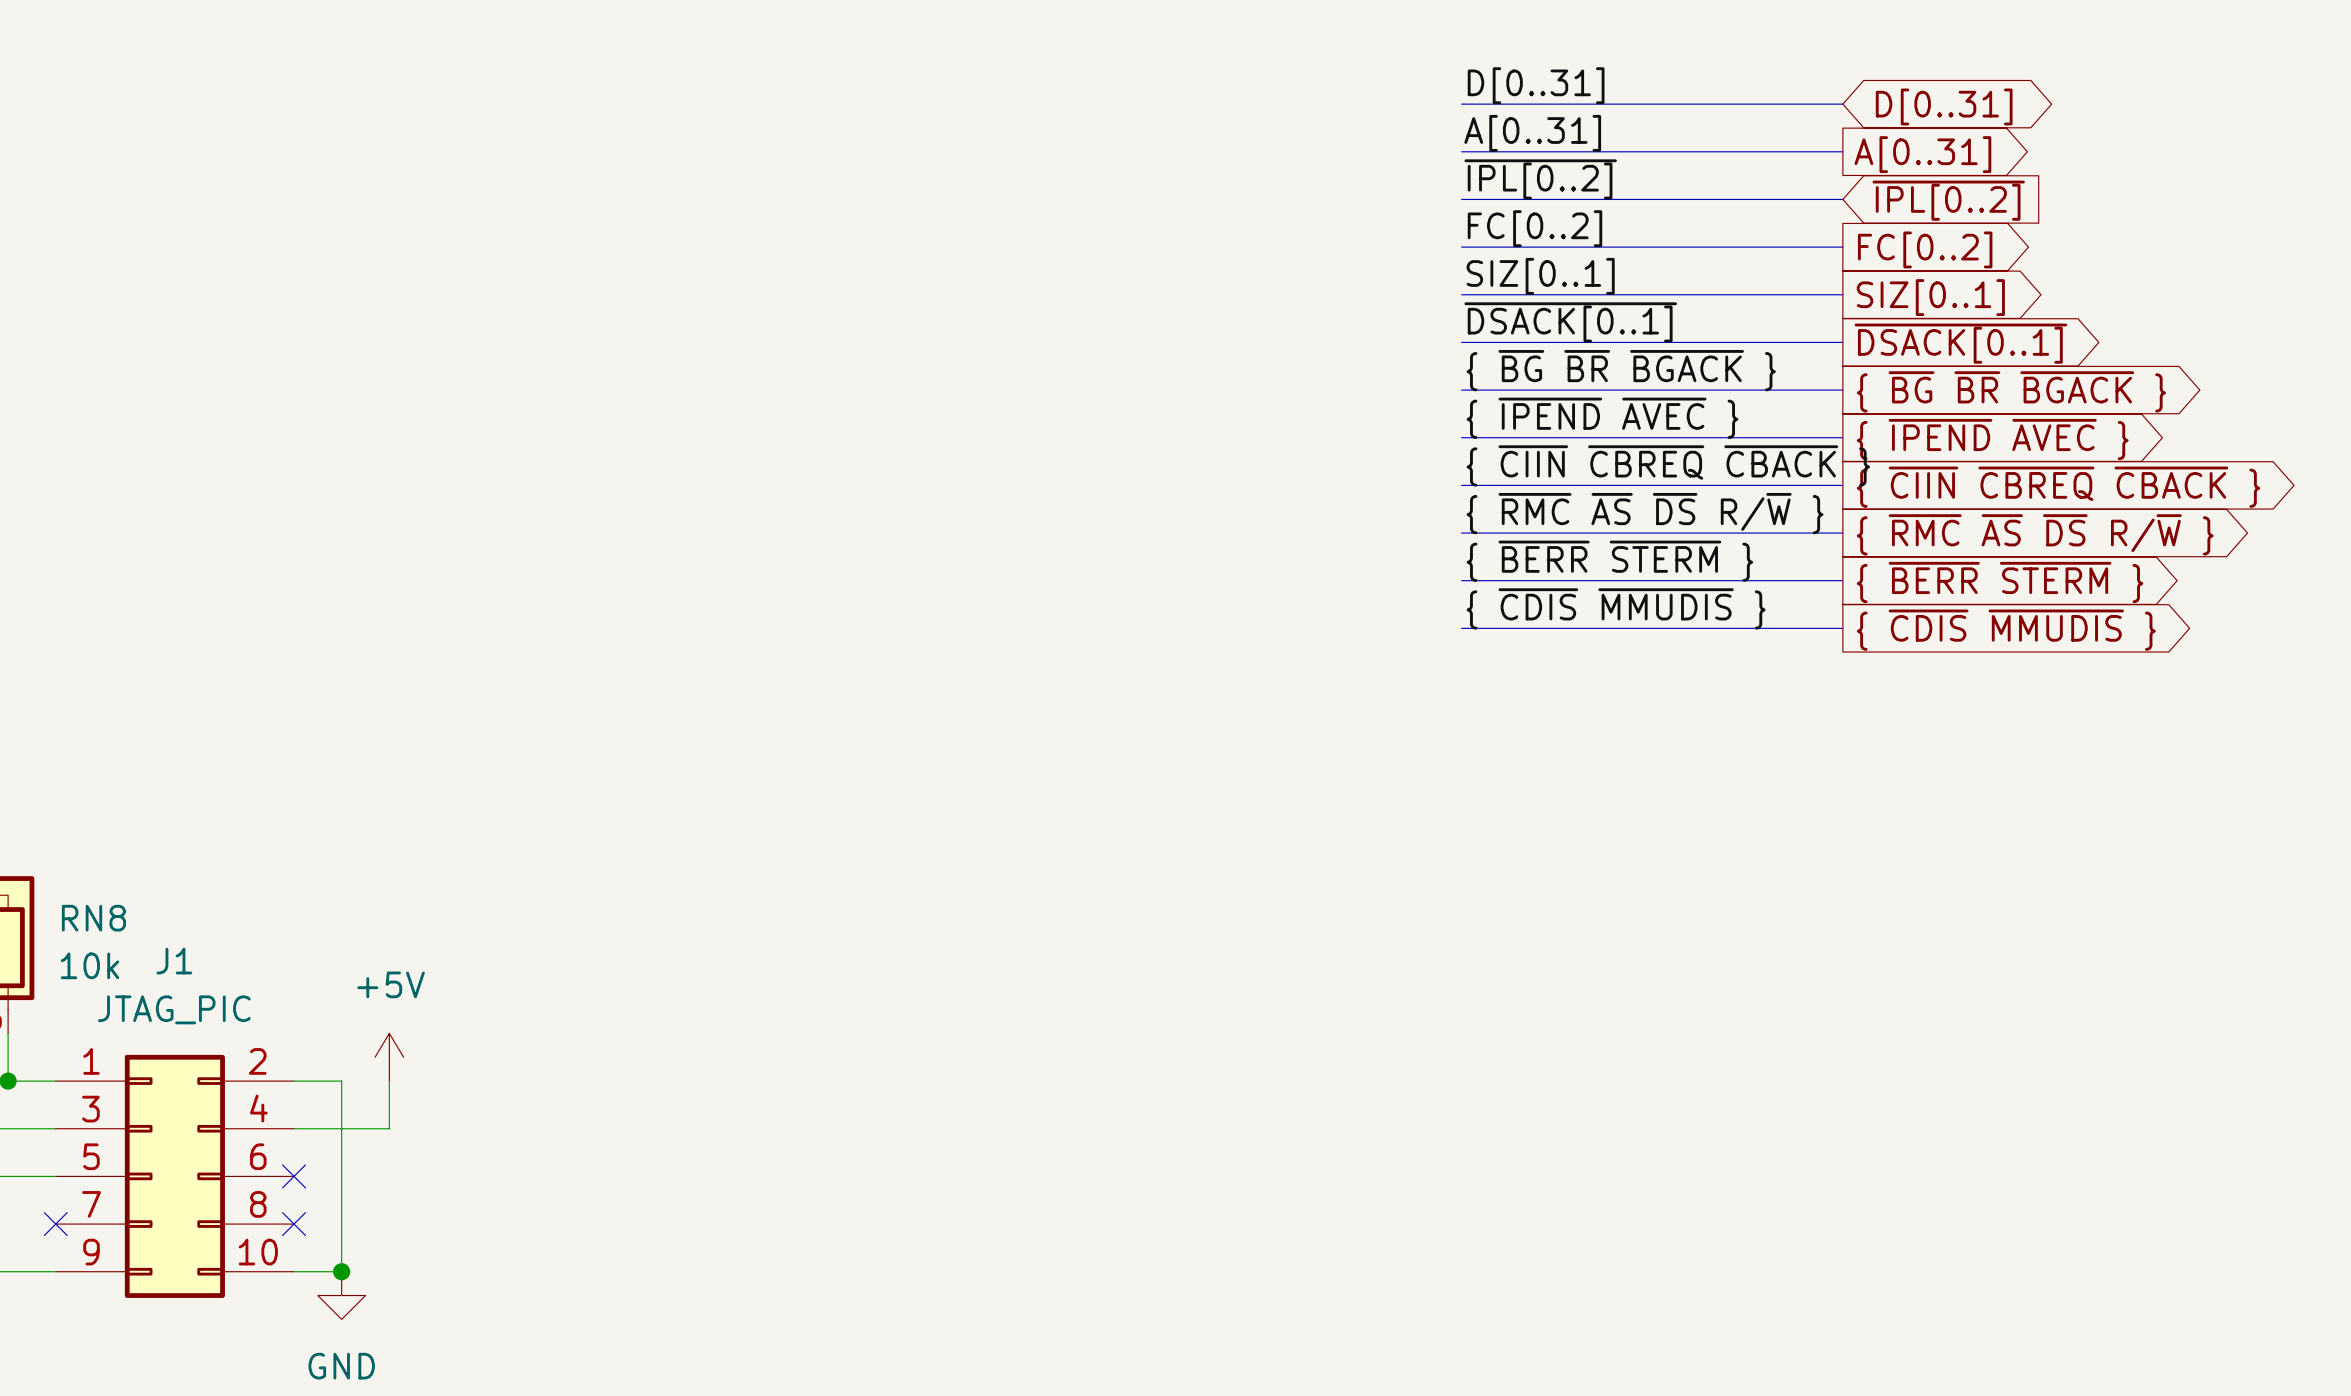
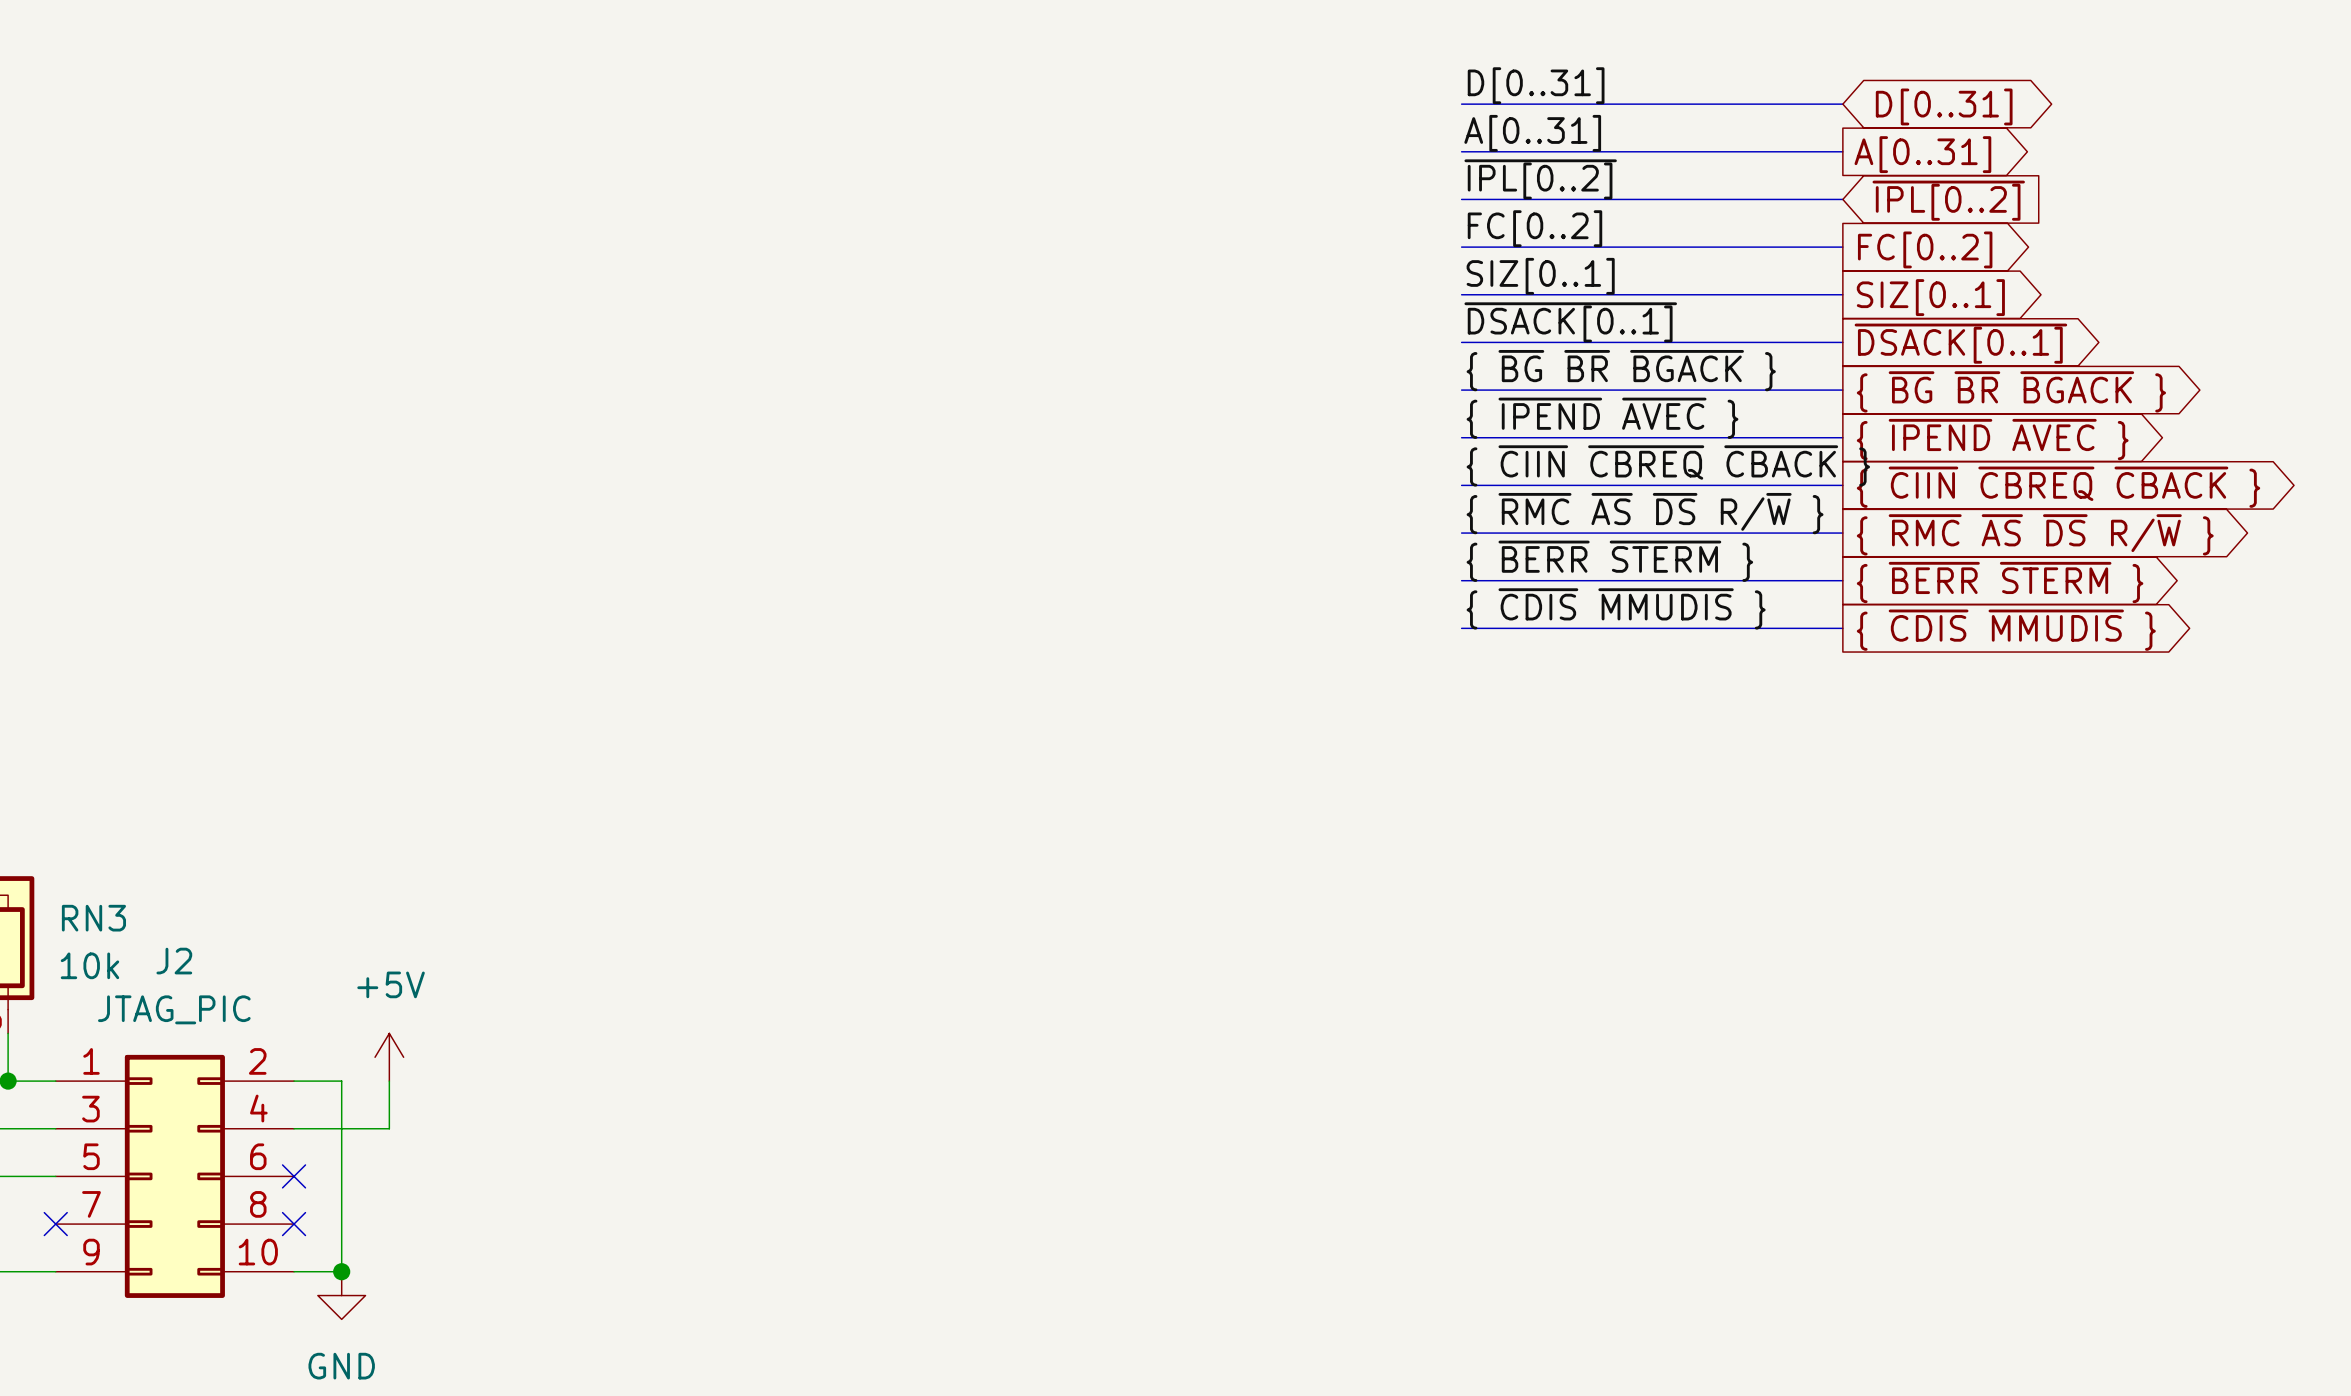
RN8 name: RN8 (93, 918) -> RN3 (93, 918)
J1 name: J1 (174, 961) -> J2 (174, 961)

